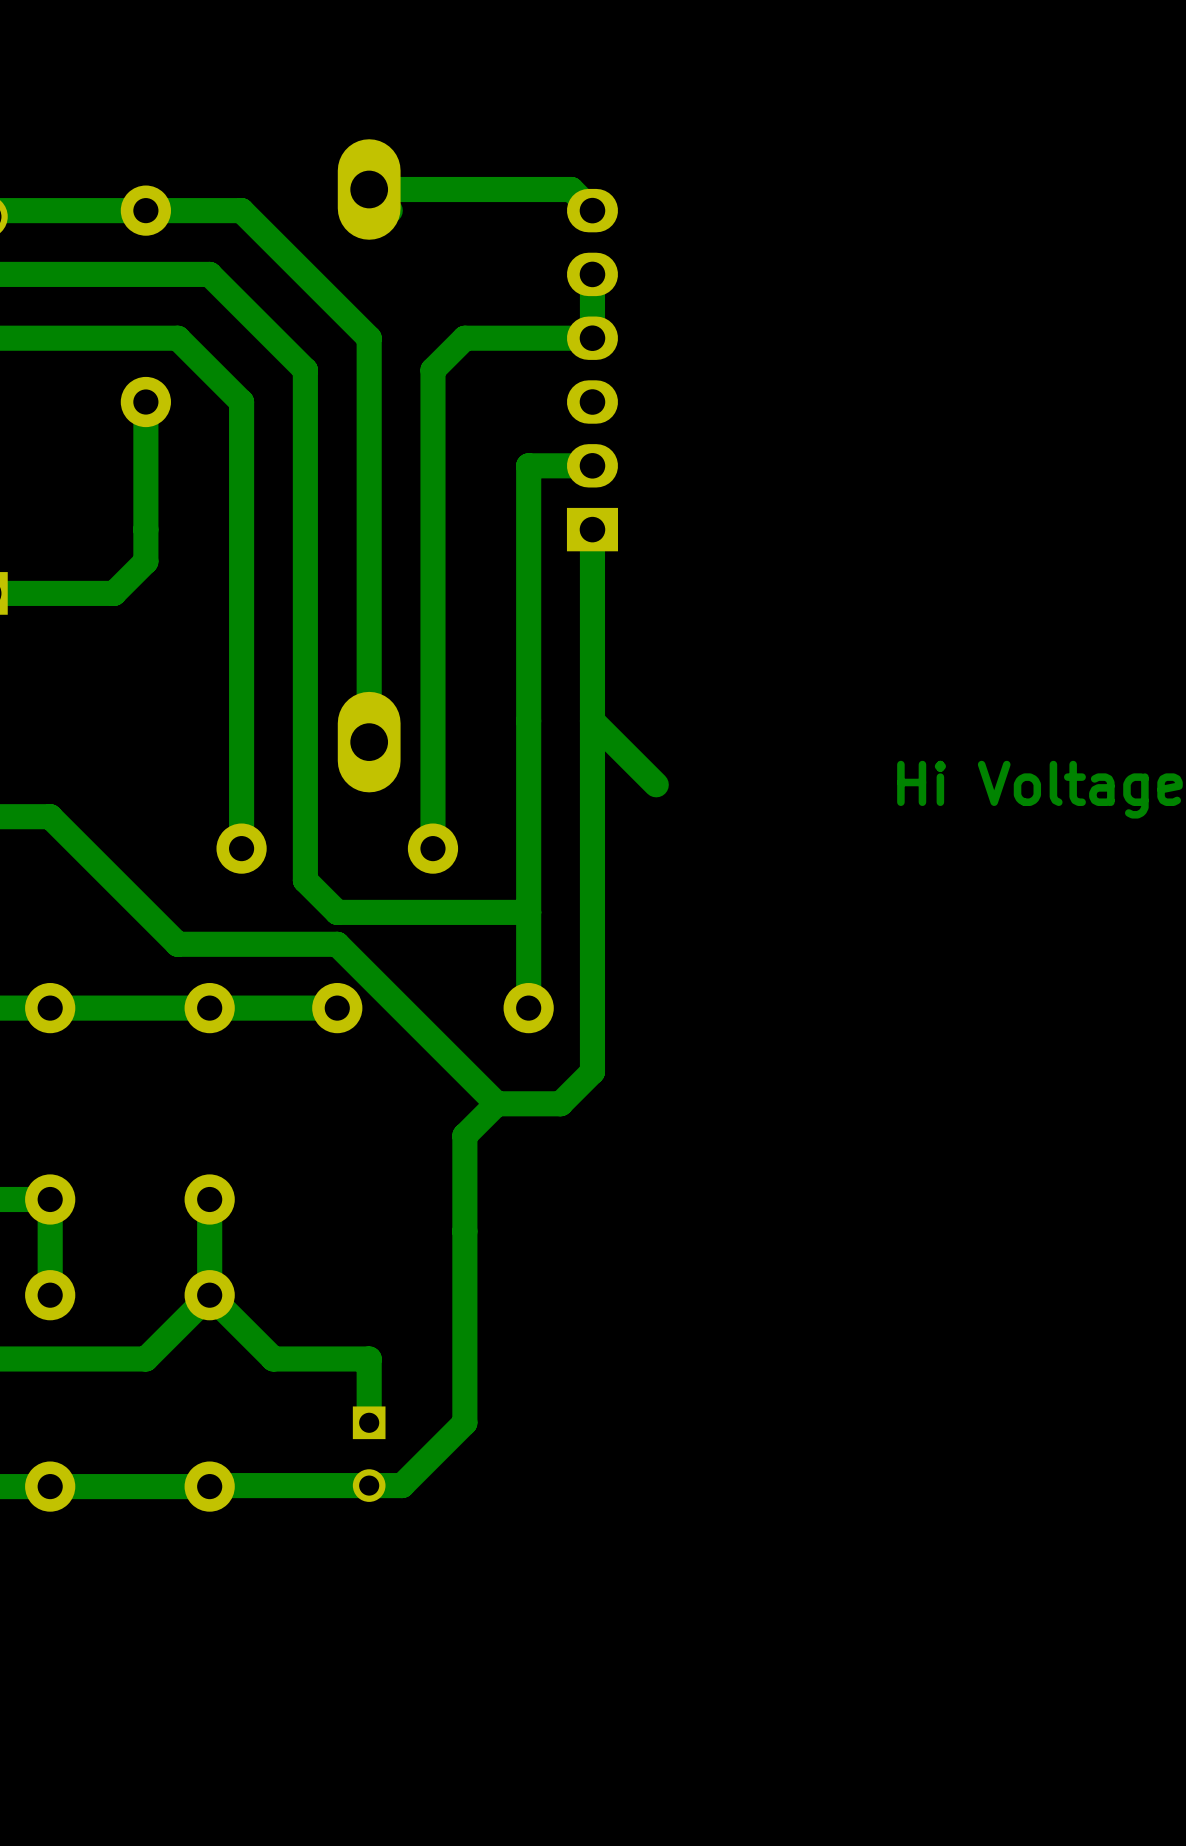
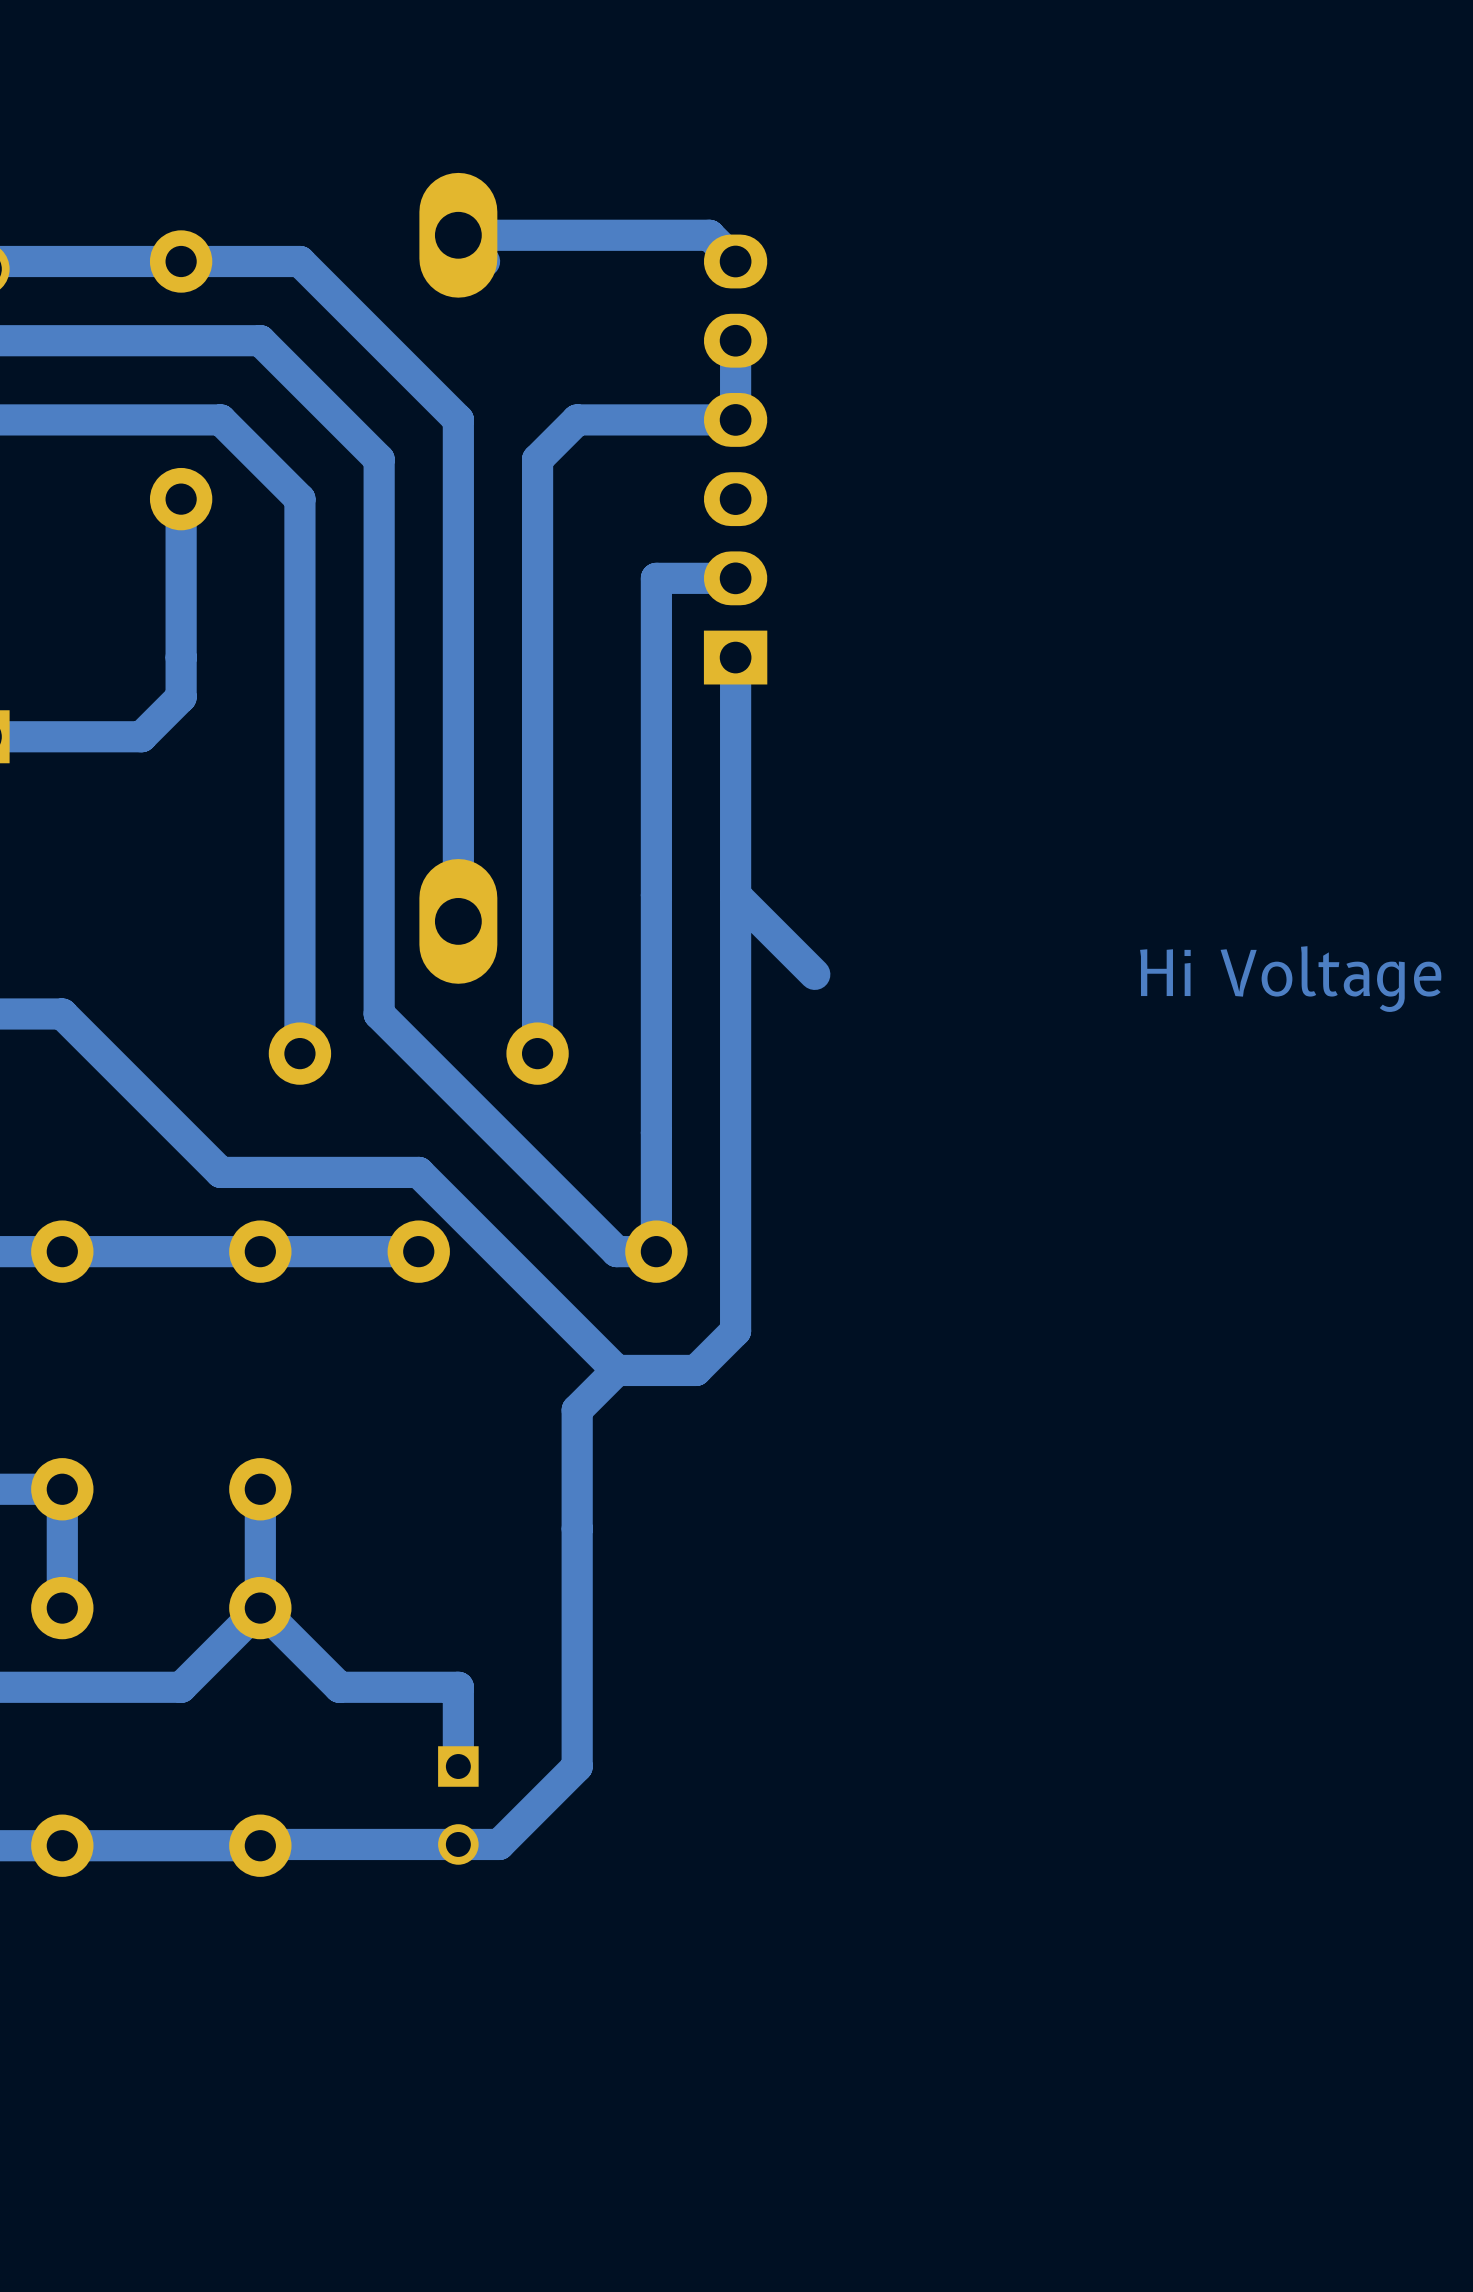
bottom track: (305, 816) (305, 880) (337, 912) (528, 912) -> (379, 1014) (616, 1251) (656, 1251)

